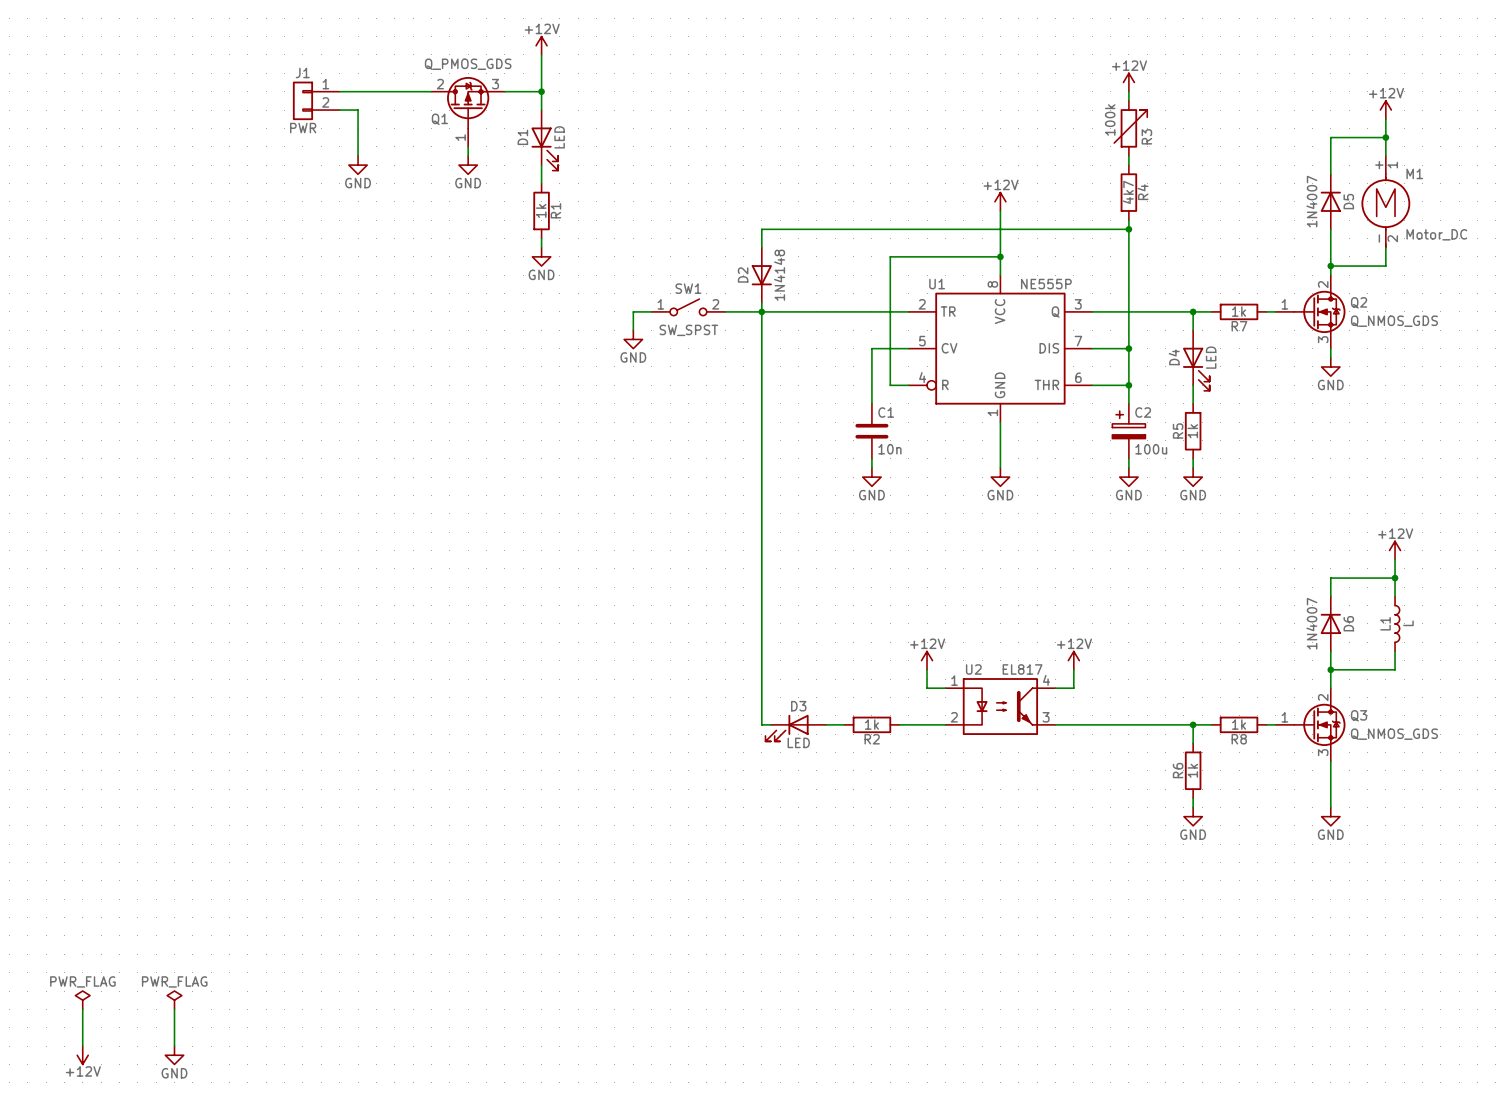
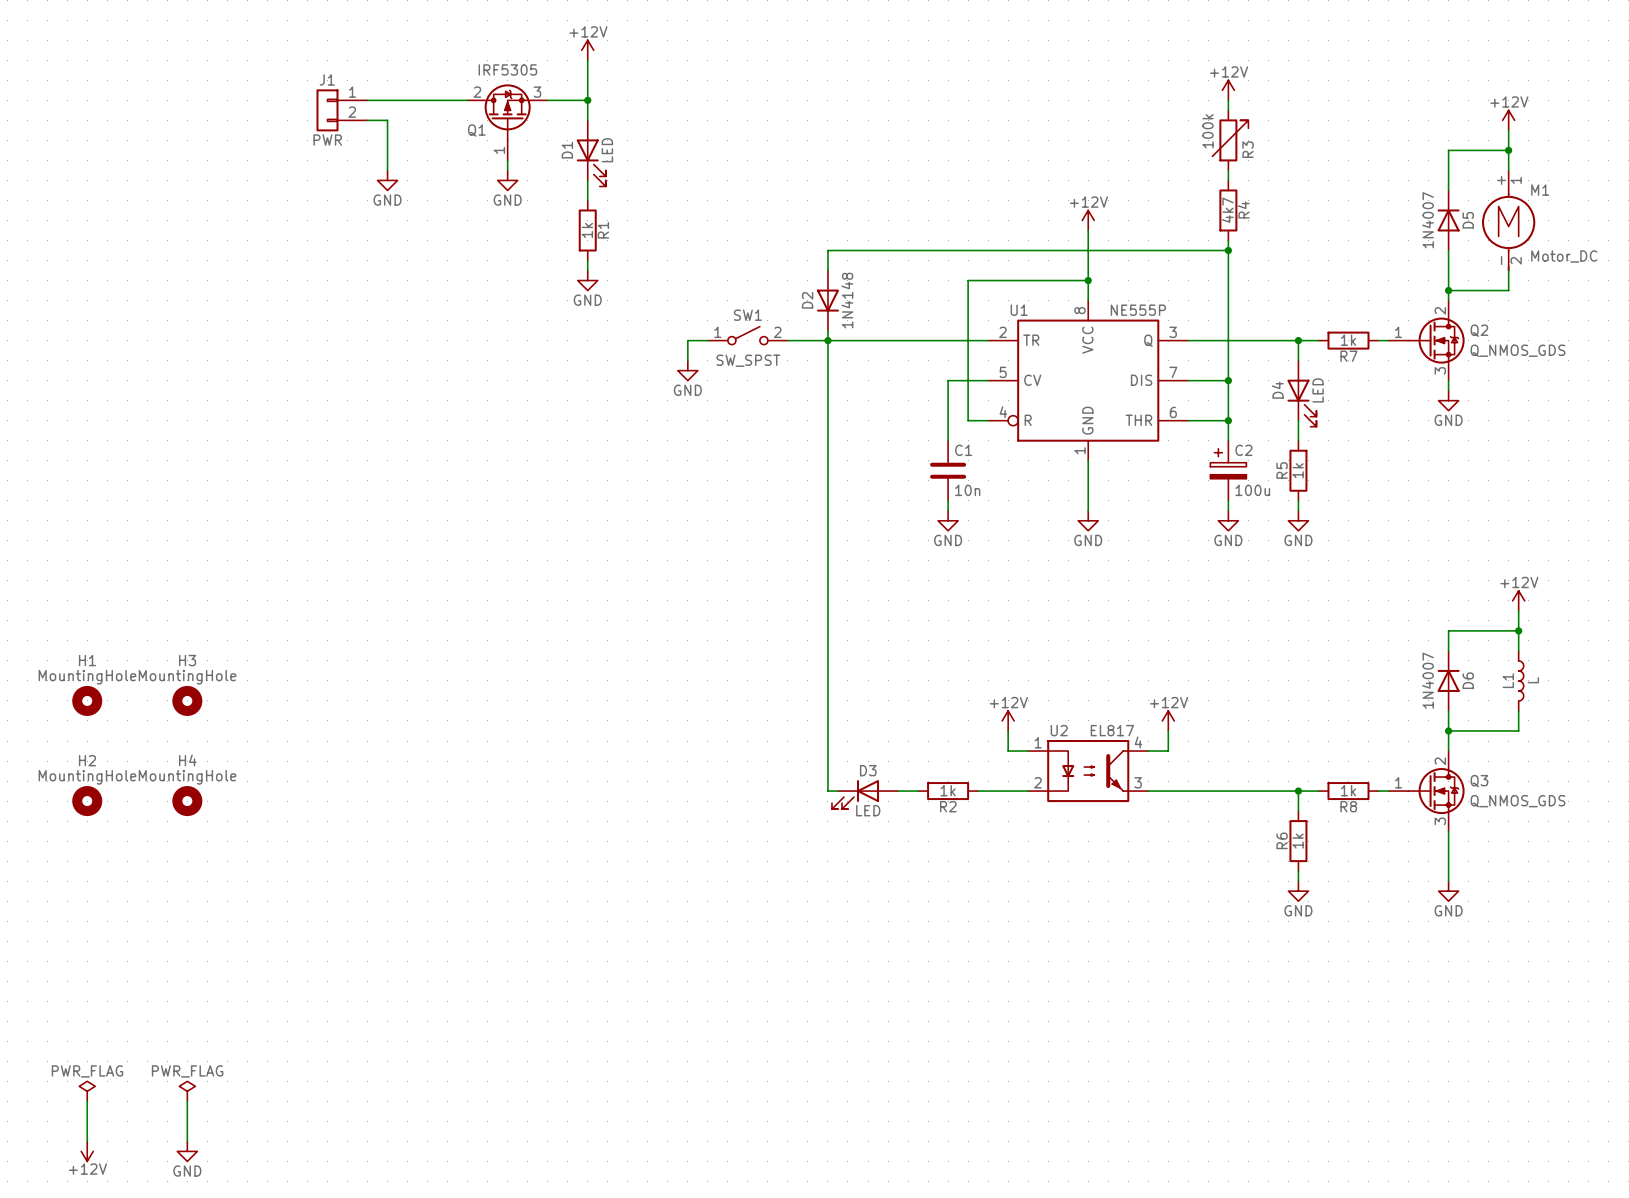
Q1 value: Q_PMOS_GDS (468, 64) -> IRF5305 (507, 69)
H1: none -> MountingHole (87, 700)
H3: none -> MountingHole (187, 700)
H2: none -> MountingHole (87, 801)
H4: none -> MountingHole (187, 801)

